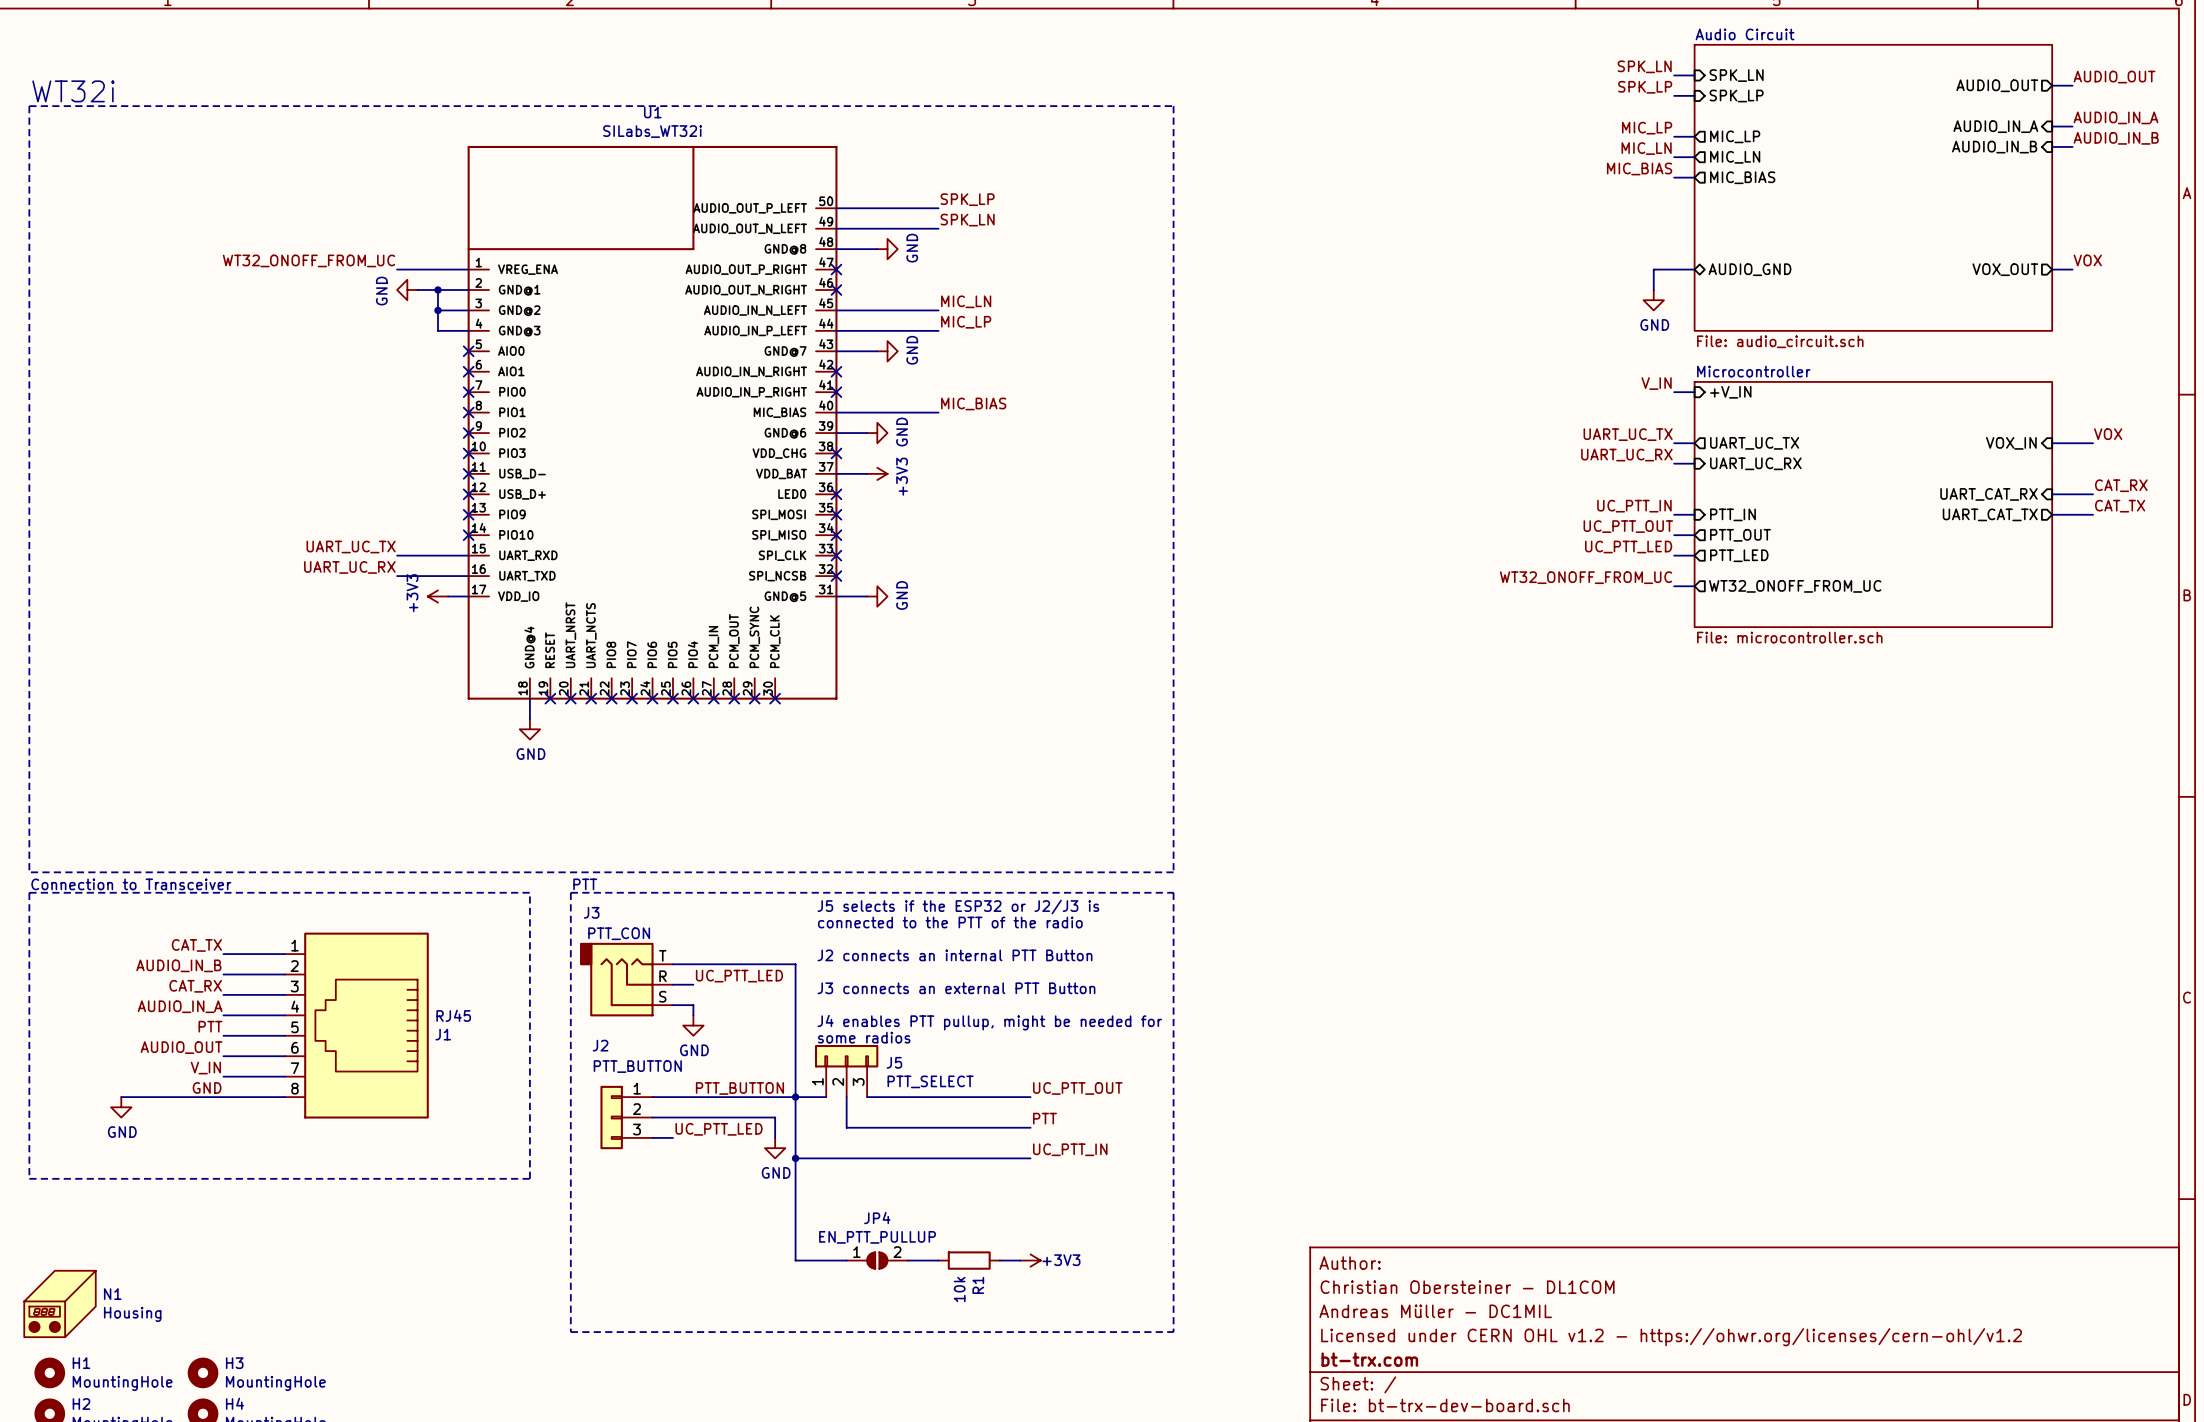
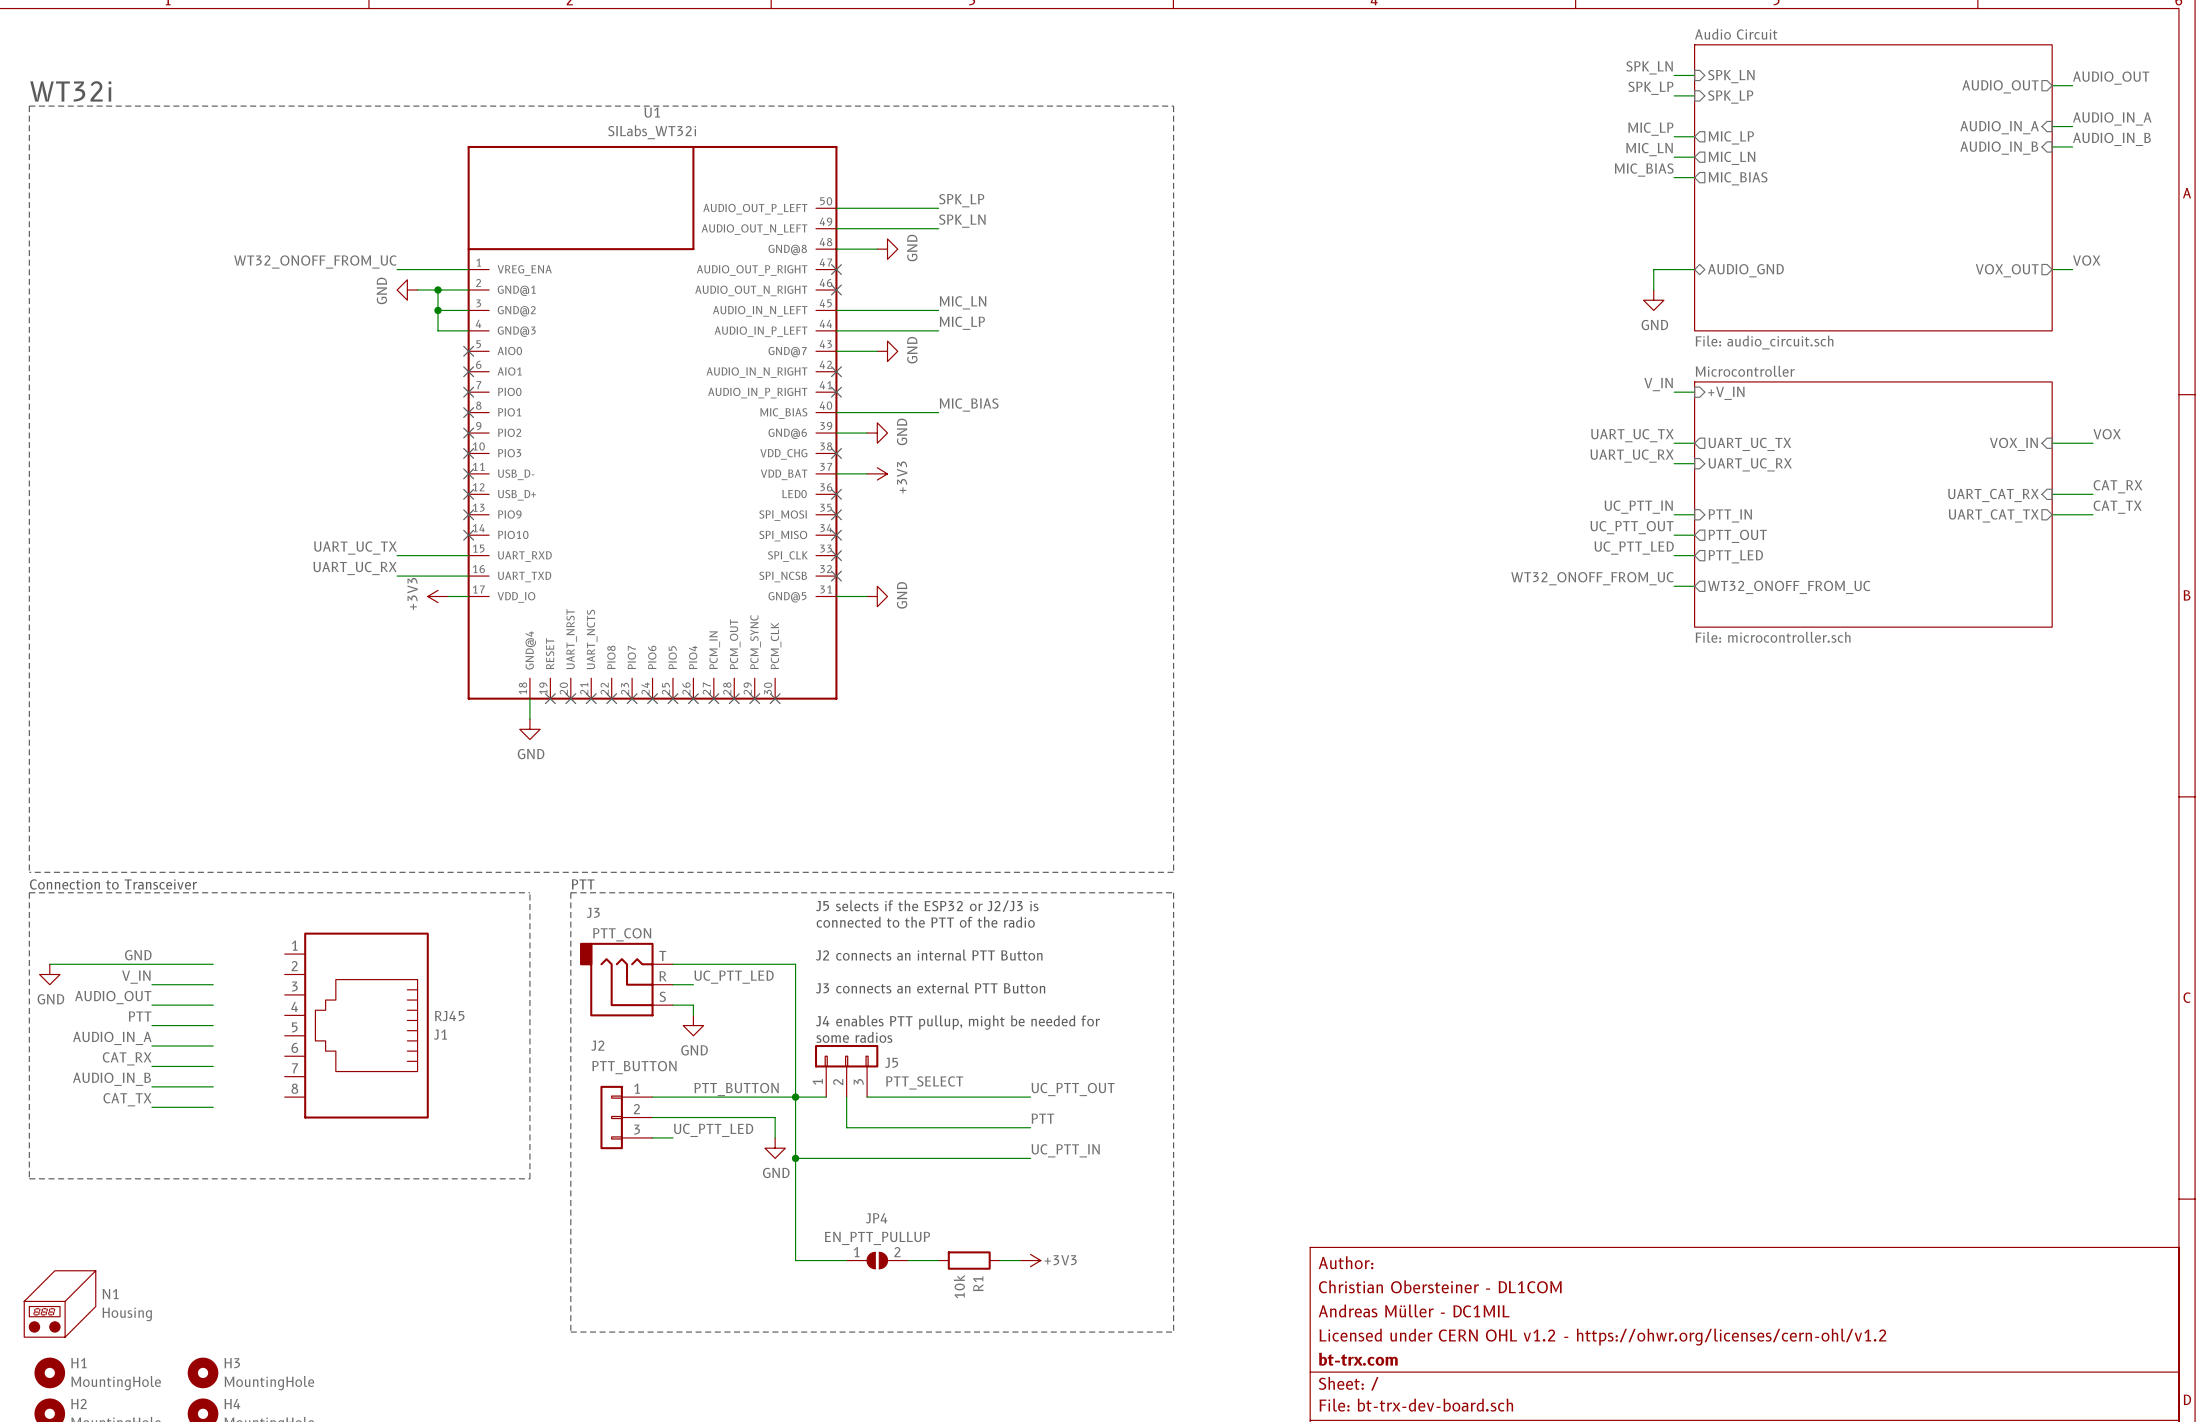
label position: CAT_TX (196, 945) -> CAT_TX (127, 1099)
wire: (223, 954) (284, 954) -> (151, 984) (213, 984)
label position: AUDIO_IN_B (178, 965) -> AUDIO_IN_B (111, 1079)
wire: (223, 974) (284, 974) -> (151, 1005) (213, 1005)
label position: CAT_RX (195, 986) -> CAT_RX (127, 1058)
wire: (223, 994) (284, 994) -> (151, 1025) (213, 1025)
label position: AUDIO_IN_A (180, 1006) -> AUDIO_IN_A (112, 1038)
wire: (223, 1015) (284, 1015) -> (151, 1046) (213, 1046)
label position: PTT (210, 1026) -> PTT (140, 1016)
wire: (223, 1035) (284, 1035) -> (151, 1066) (213, 1066)
label position: AUDIO_OUT (181, 1047) -> AUDIO_OUT (113, 997)
wire: (223, 1056) (284, 1056) -> (151, 1086) (213, 1086)
label position: V_IN (205, 1068) -> V_IN (136, 977)
wire: (223, 1076) (284, 1076) -> (151, 1107) (213, 1107)
label position: GND (207, 1087) -> GND (138, 955)
wire: (121, 1097) (284, 1097) -> (49, 964) (213, 964)
power symbol position: GND (121, 1107) -> GND (49, 974)

